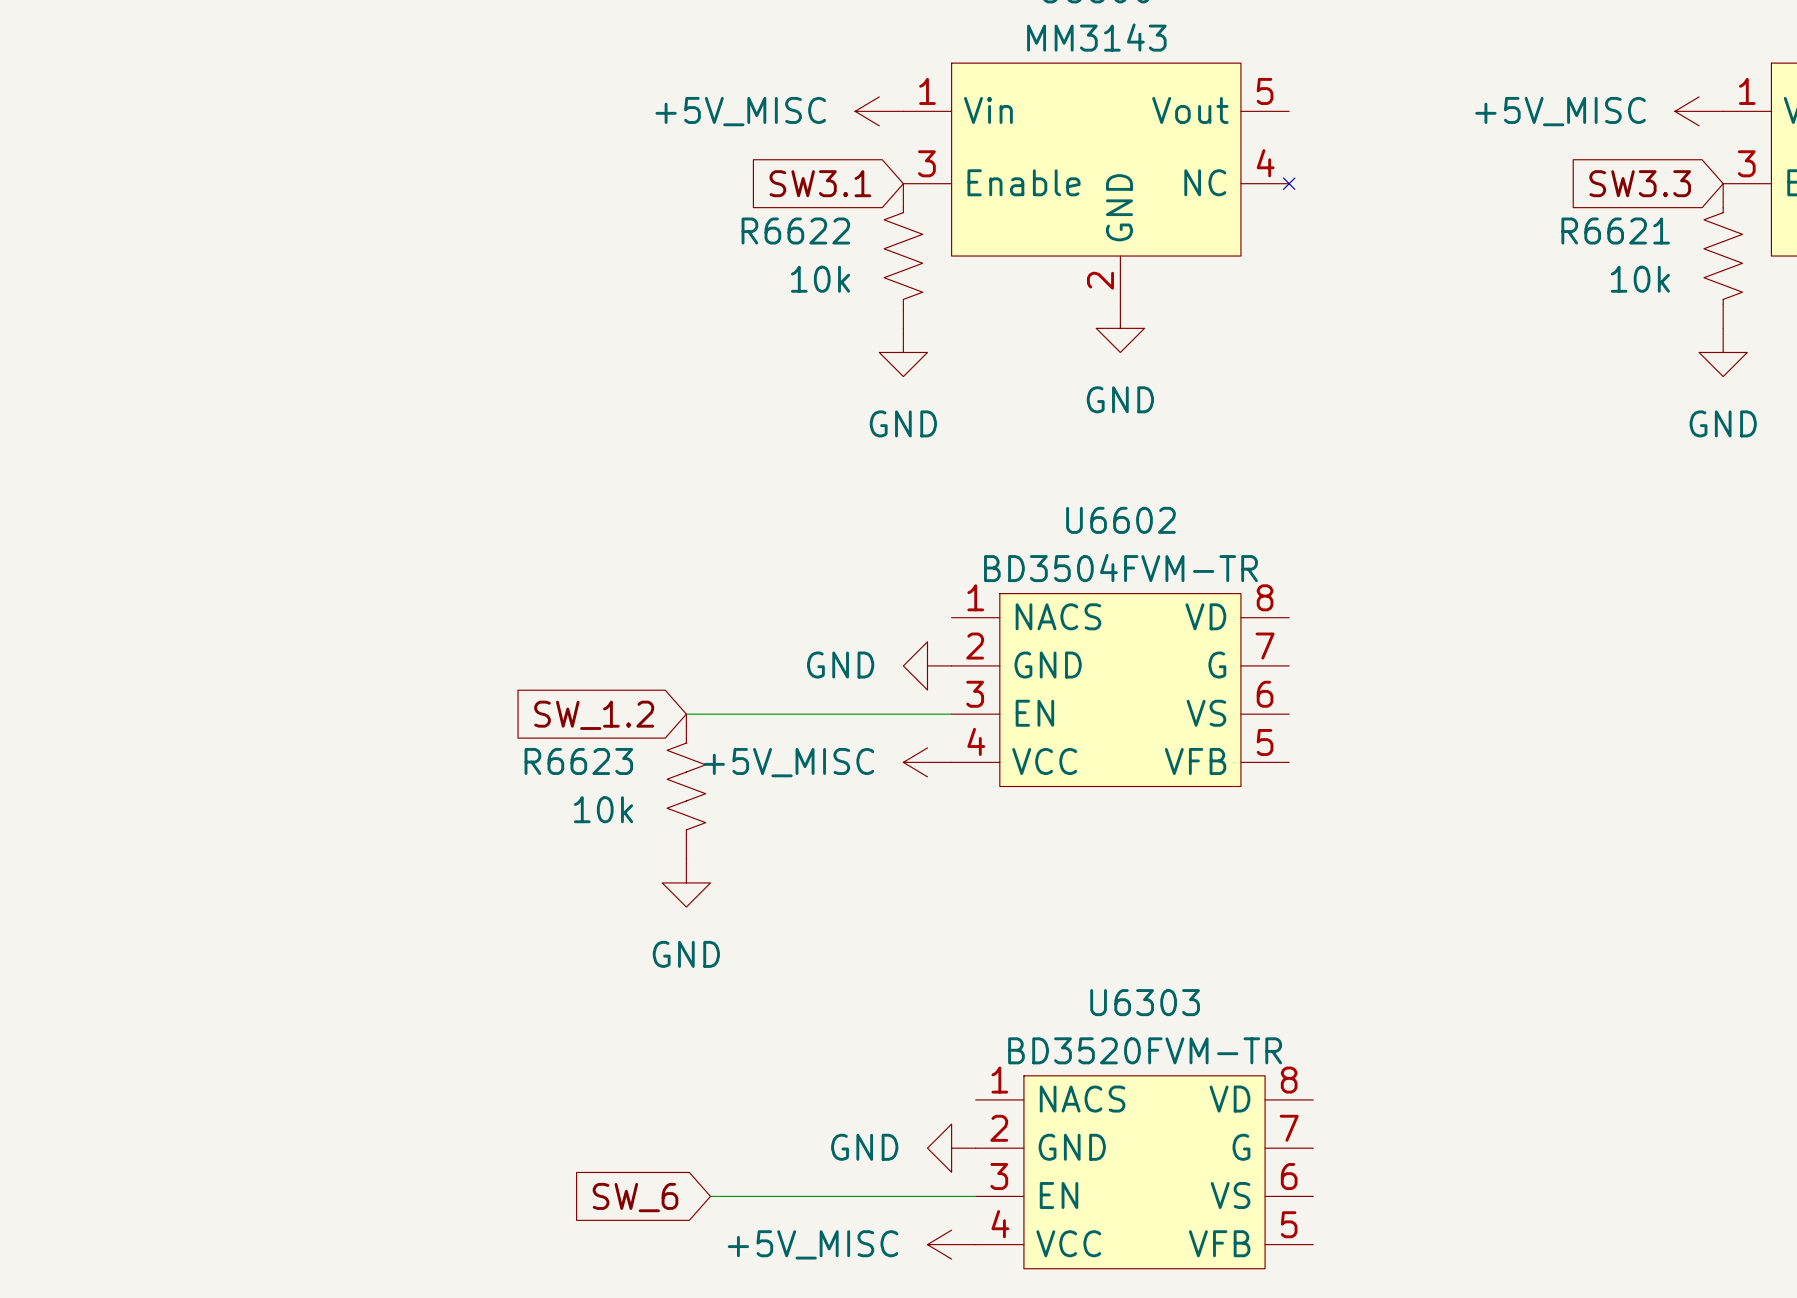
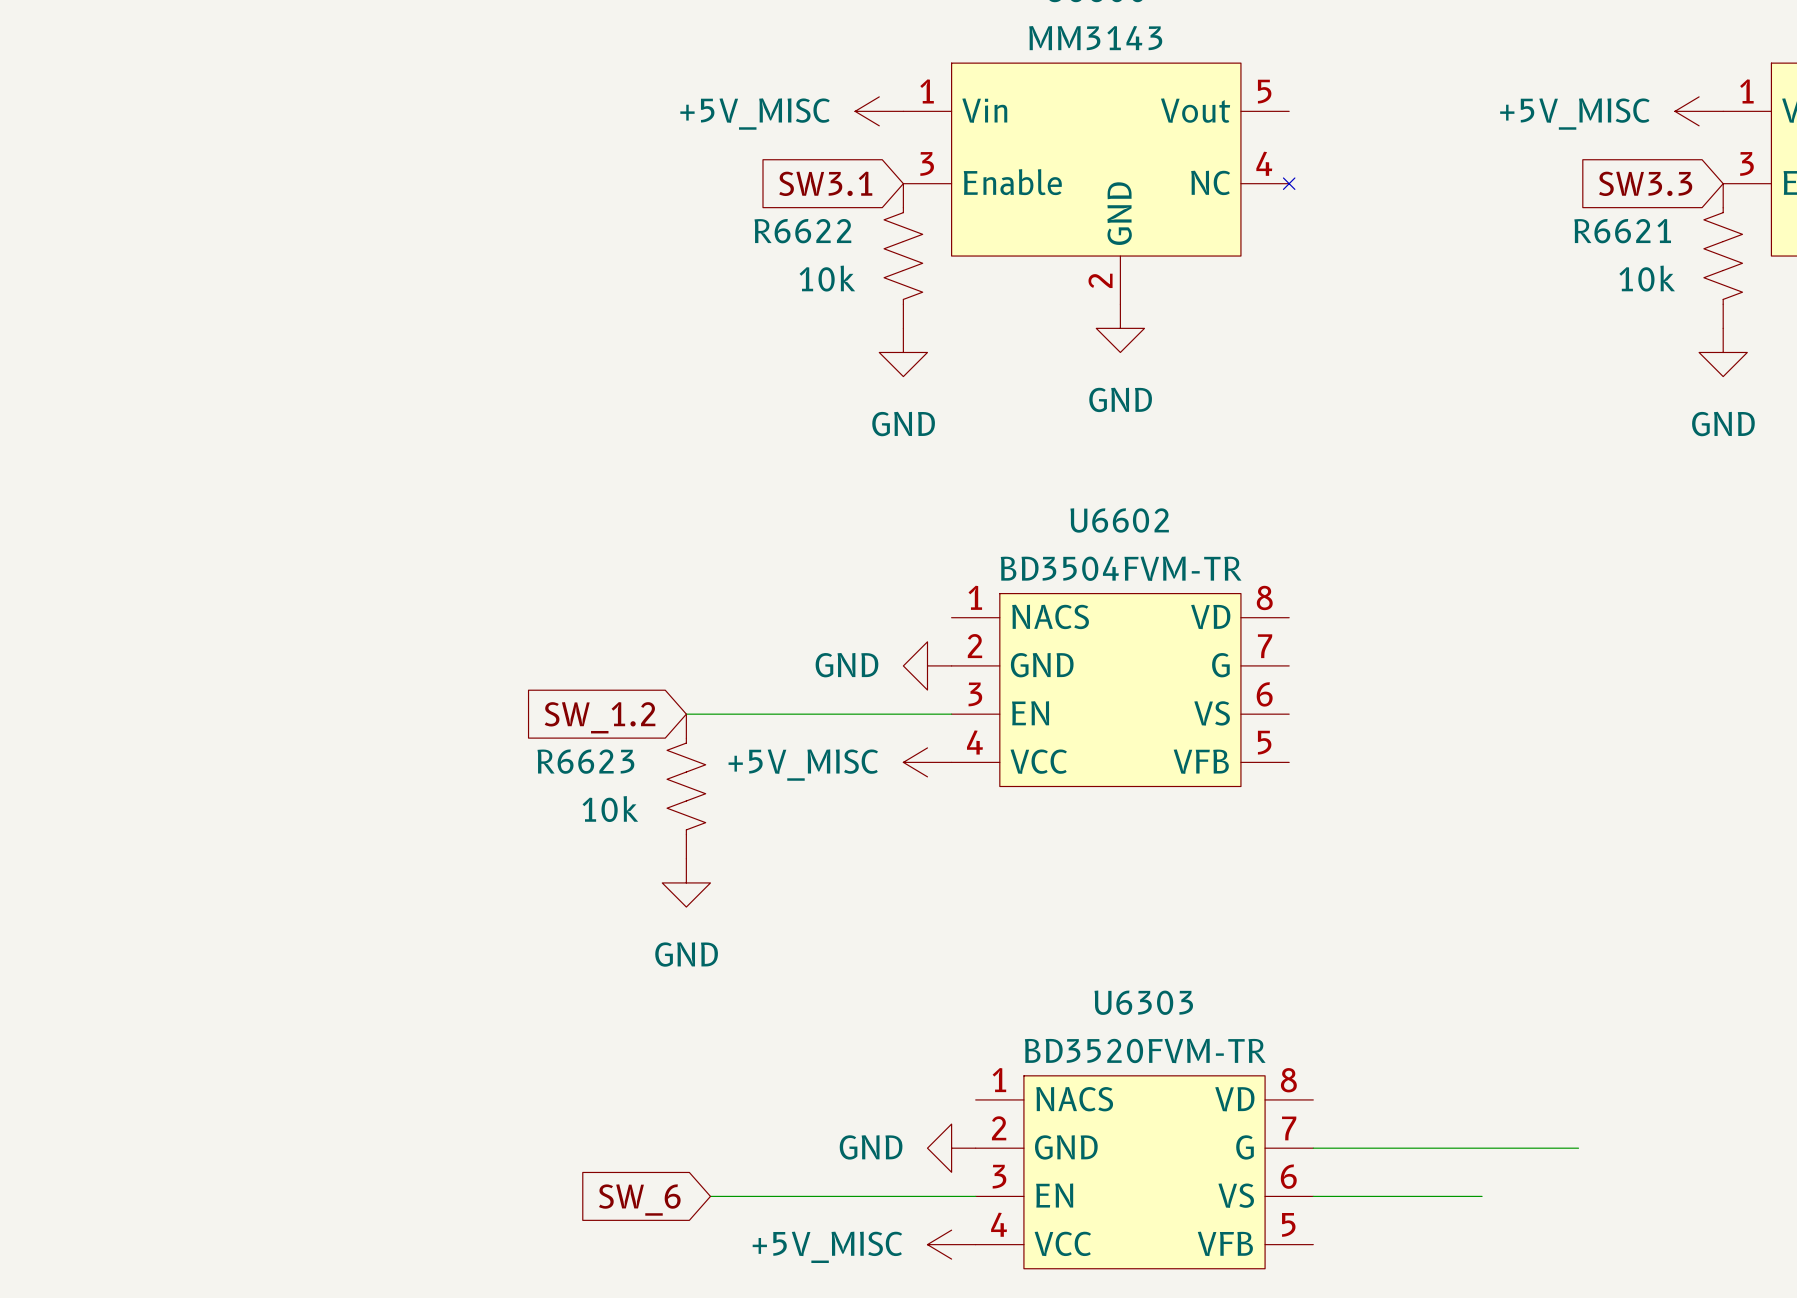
wire: none -> (1313, 1148) (1578, 1148)
wire: none -> (1313, 1196) (1482, 1196)

